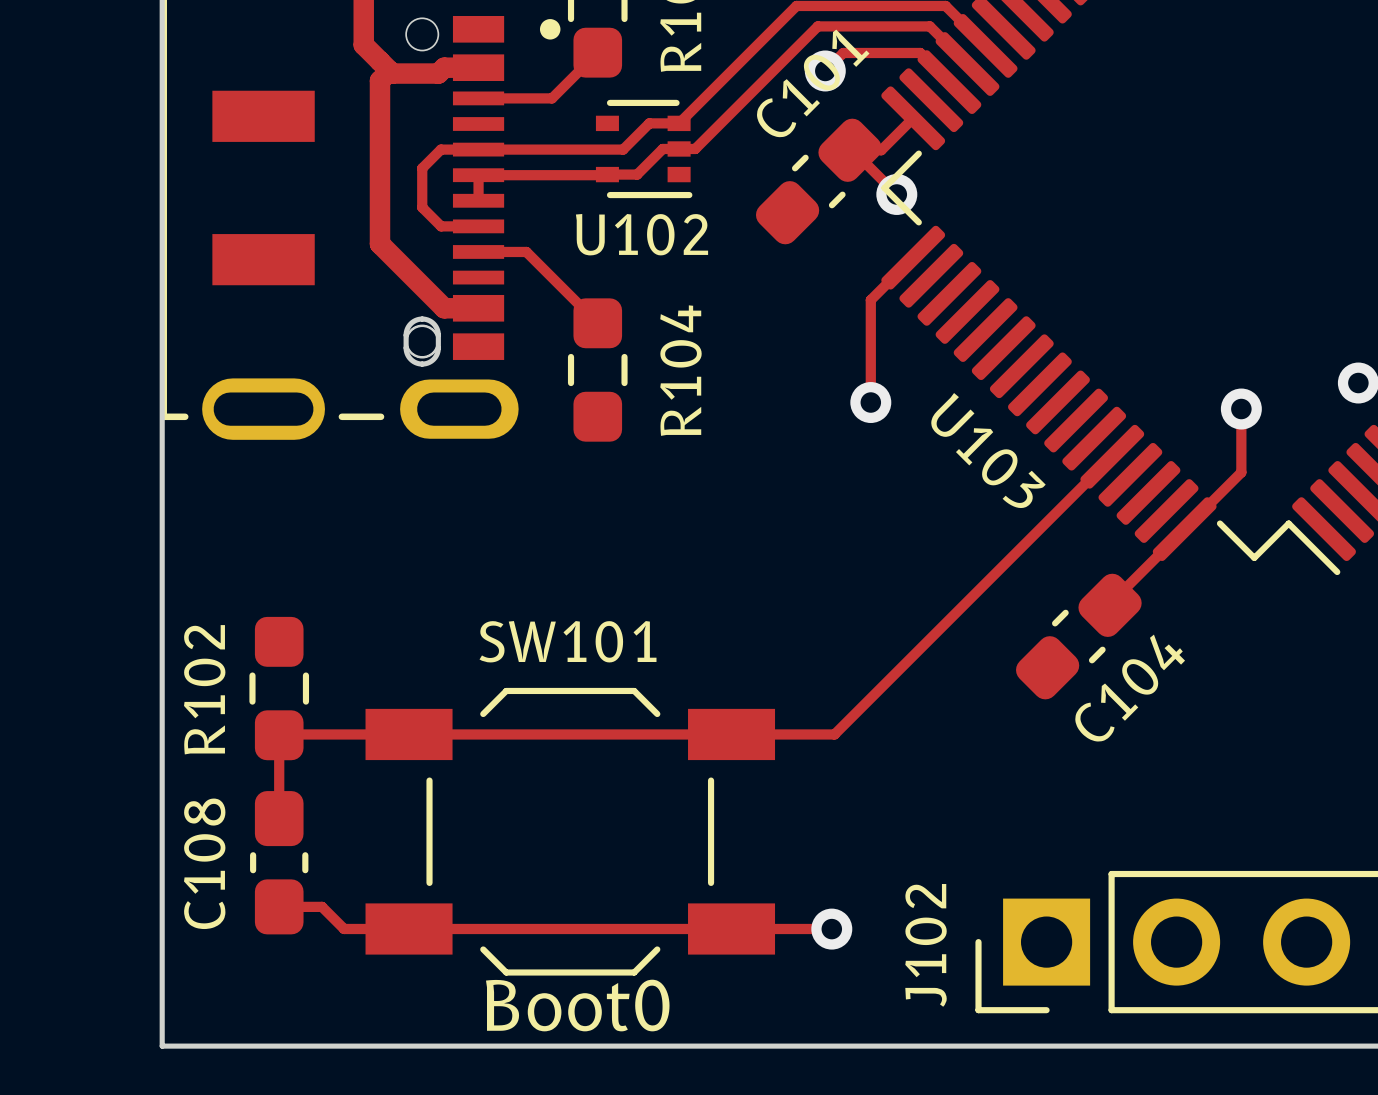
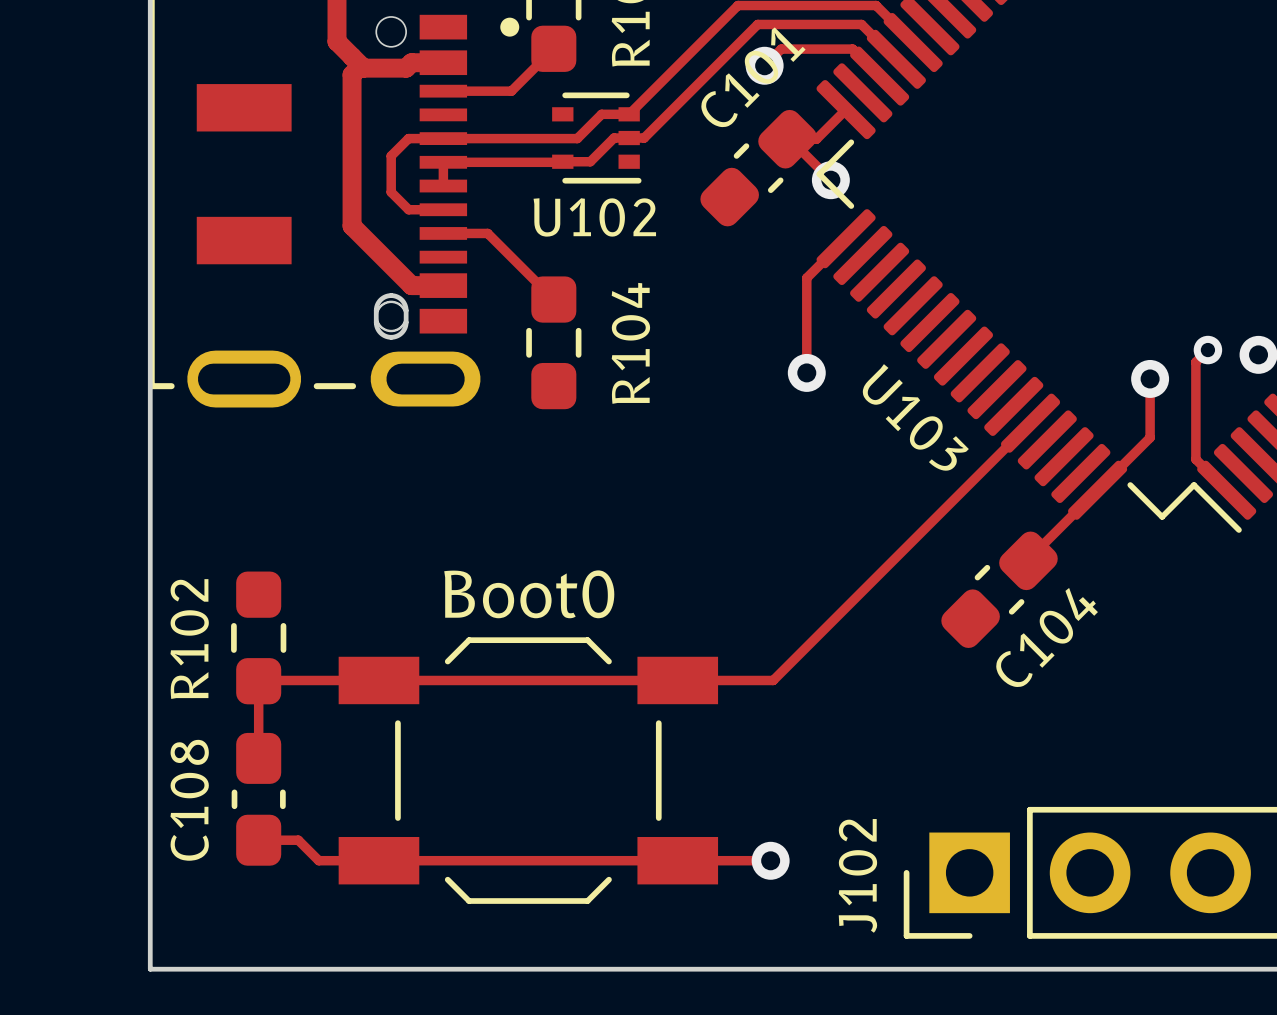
track: none -> (1207, 350) (1195, 362) (1195, 459) (1226, 490)
via: none -> (1207, 350)
SW101 name: SW101 (568, 641) -> none
text position: Boot0 (577, 1005) -> Boot0 (529, 594)

